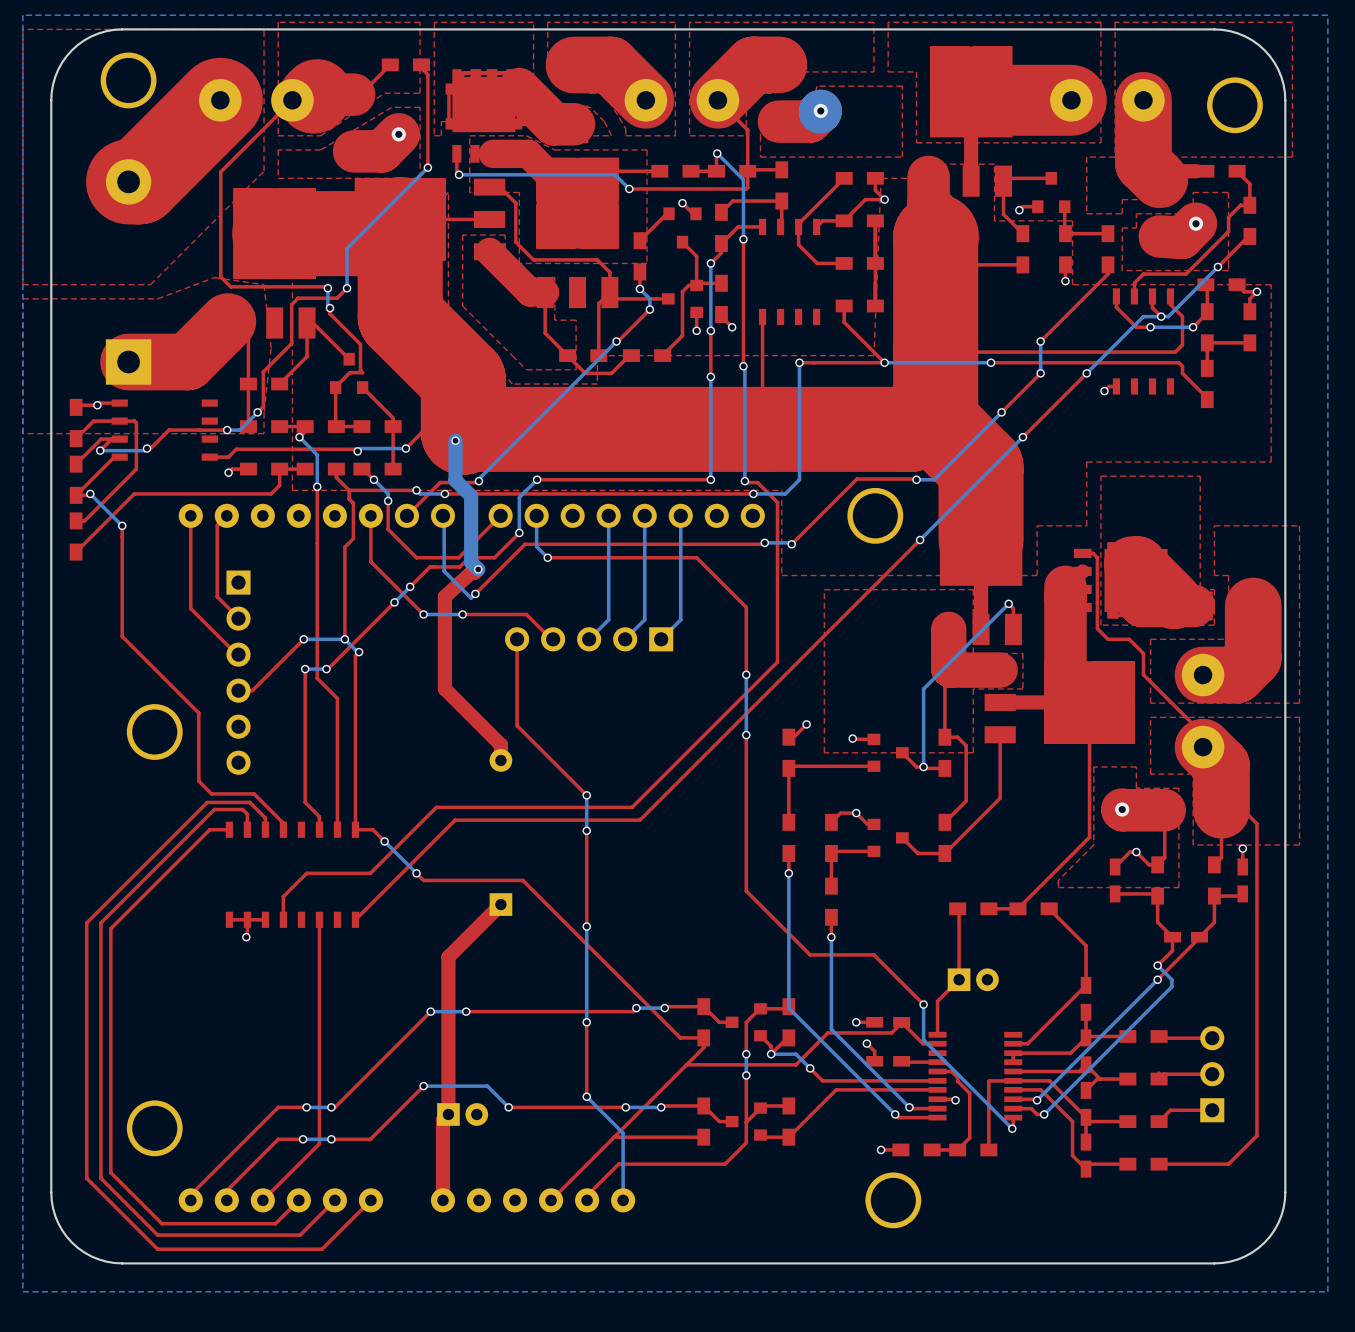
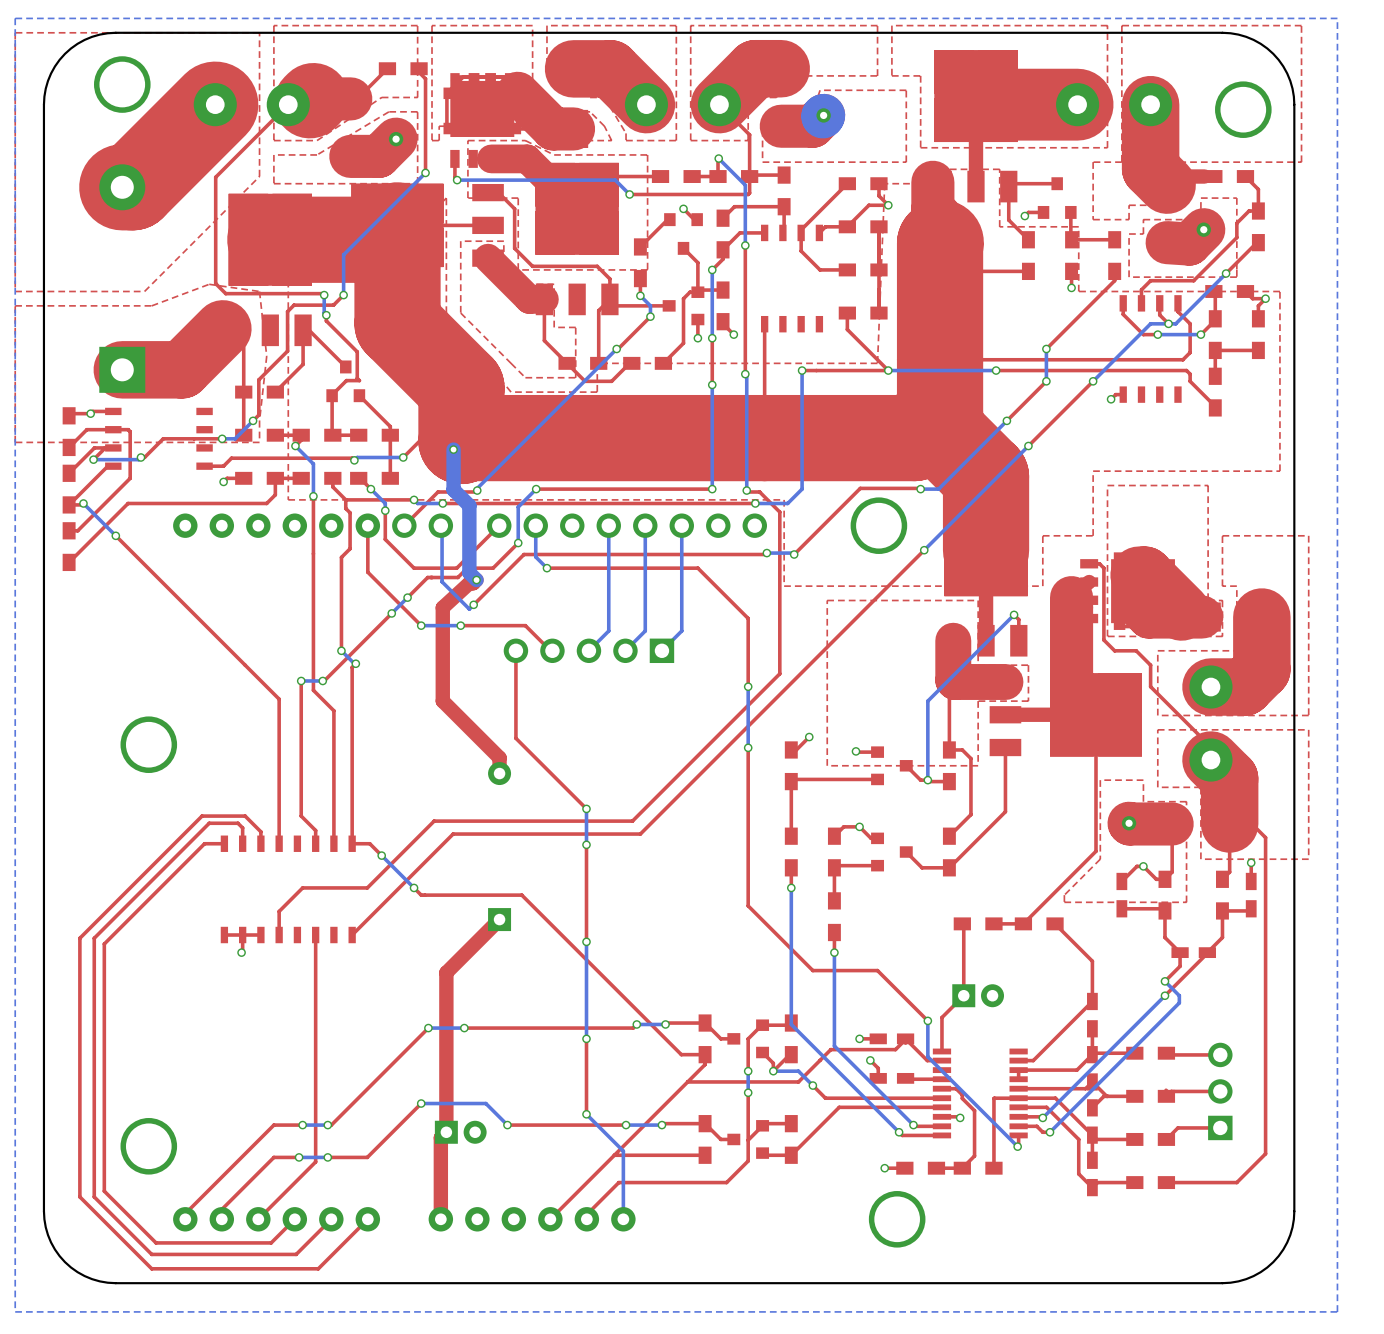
top track: (190, 515) (190, 608) (238, 654) -> none
top track: (226, 515) (217, 525) (217, 596) (238, 618) -> none
top track: (122, 525) (122, 636) (198, 713) (198, 781) (211, 793) (254, 793) (283, 823) -> (115, 535) (279, 699) (279, 837)
top track: (303, 639) (252, 690) (238, 690) -> none
via: (303, 639) -> none
bottom track: (344, 639) (303, 639) -> none
part: (238, 672) -> none

